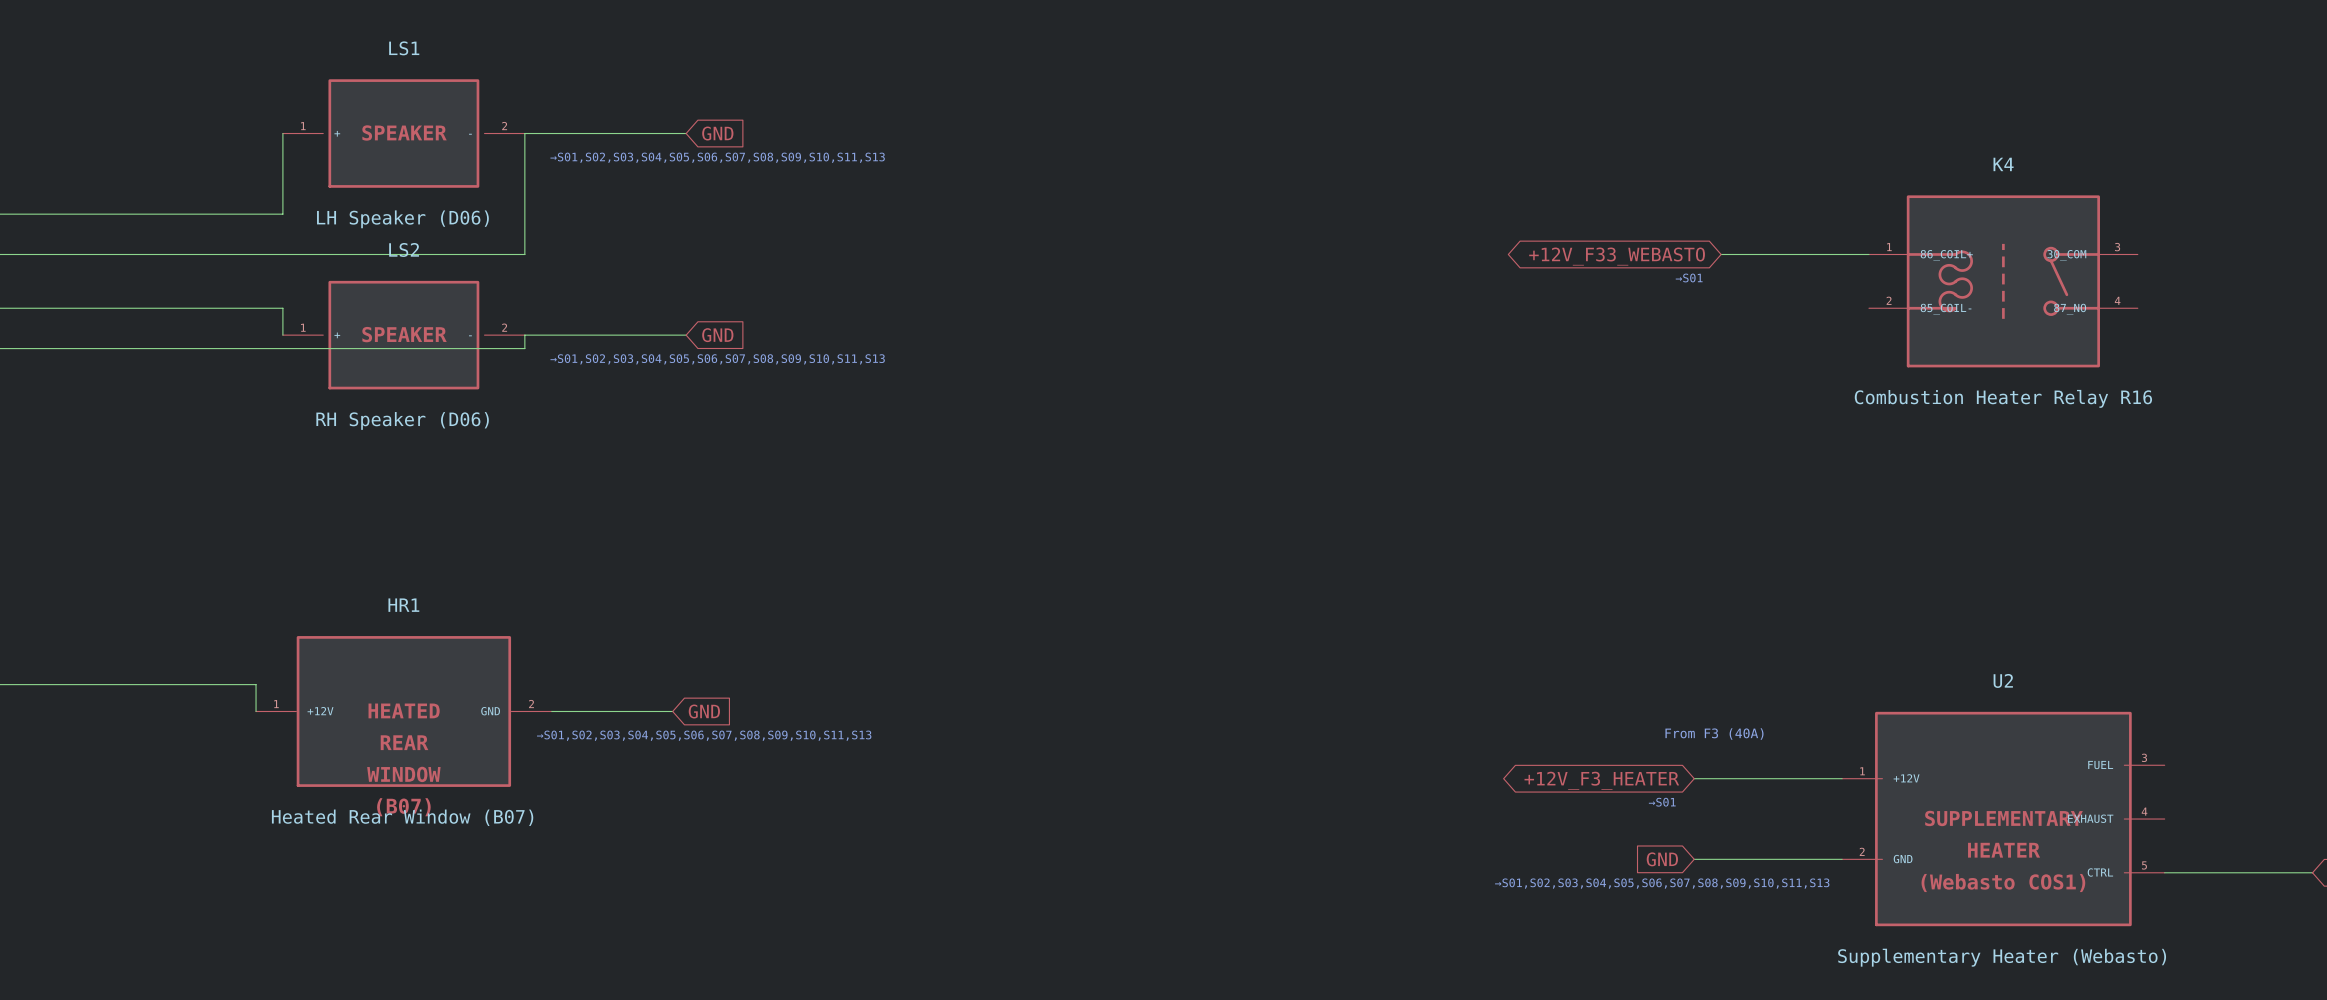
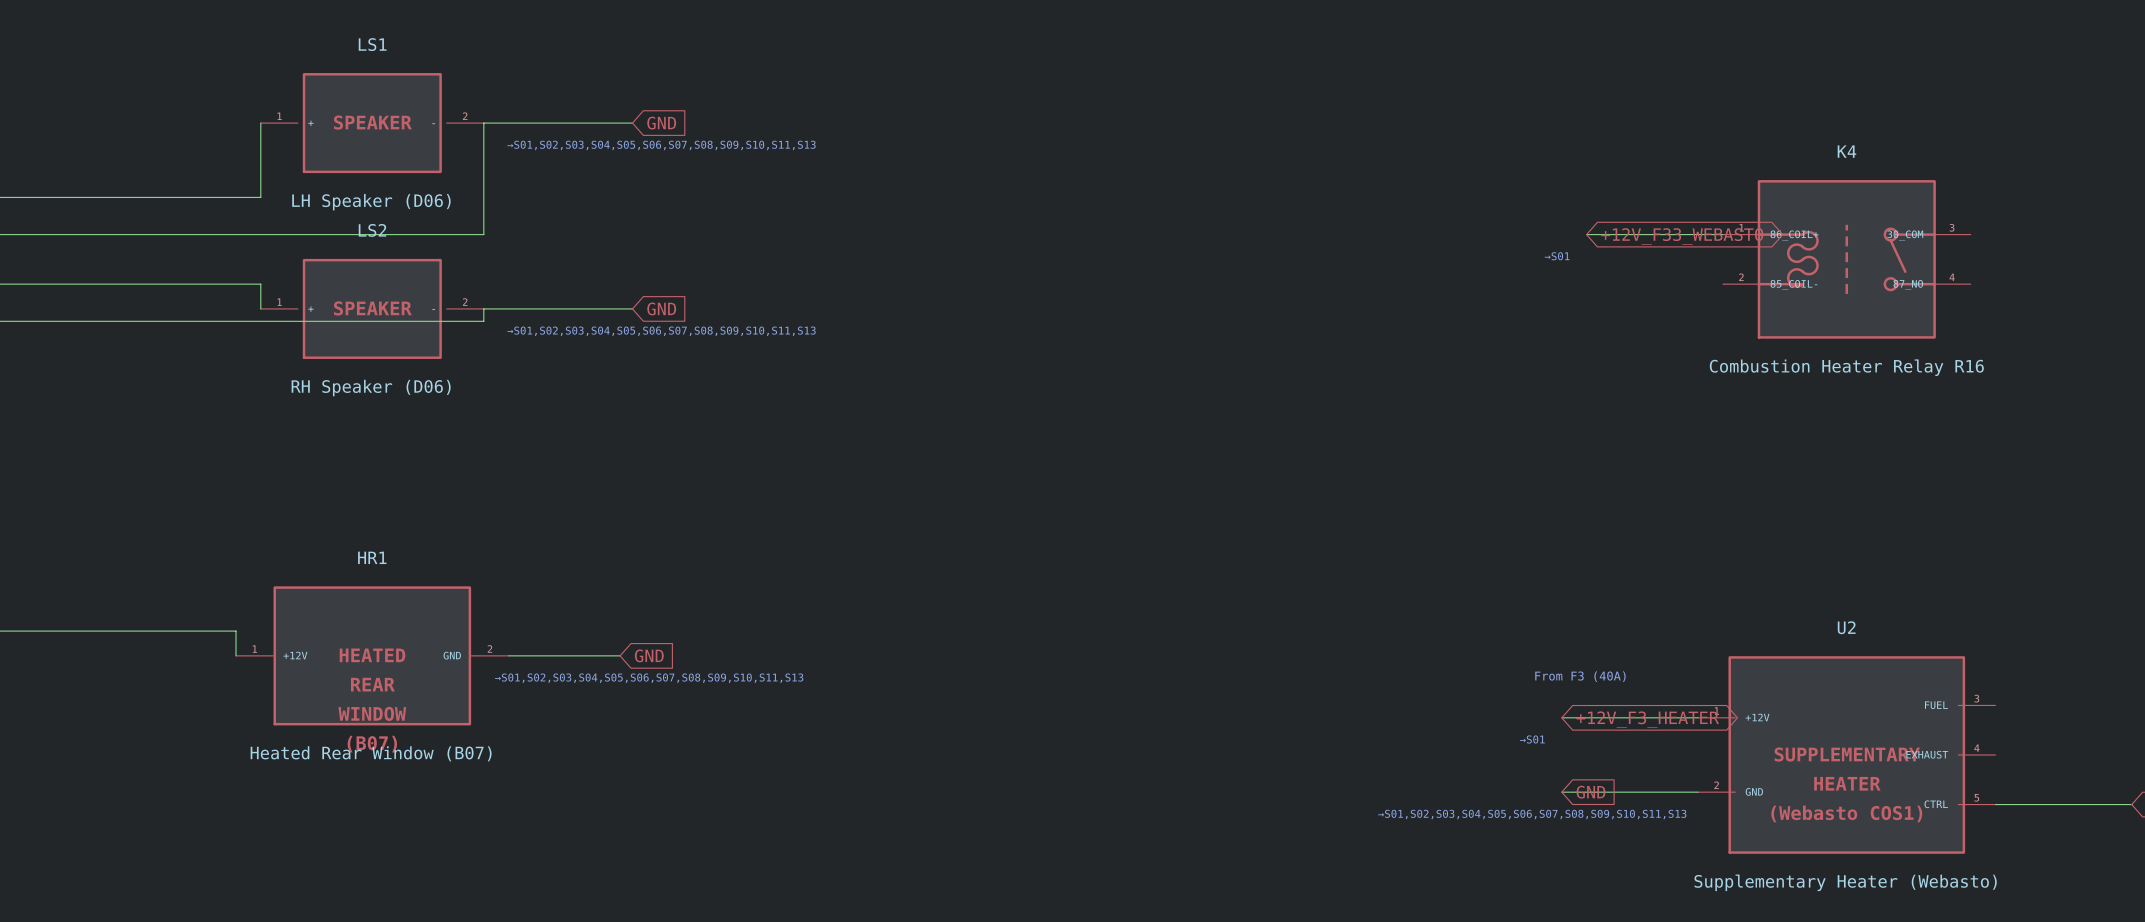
global label rotation: 0° (1617, 256) -> 180° (1682, 236)
global label position: +12V_F33_WEBASTO (1617, 256) -> +12V_F33_WEBASTO (1682, 236)
global label rotation: 0° (1601, 780) -> 180° (1647, 719)
global label rotation: 0° (1662, 859) -> 180° (1590, 792)

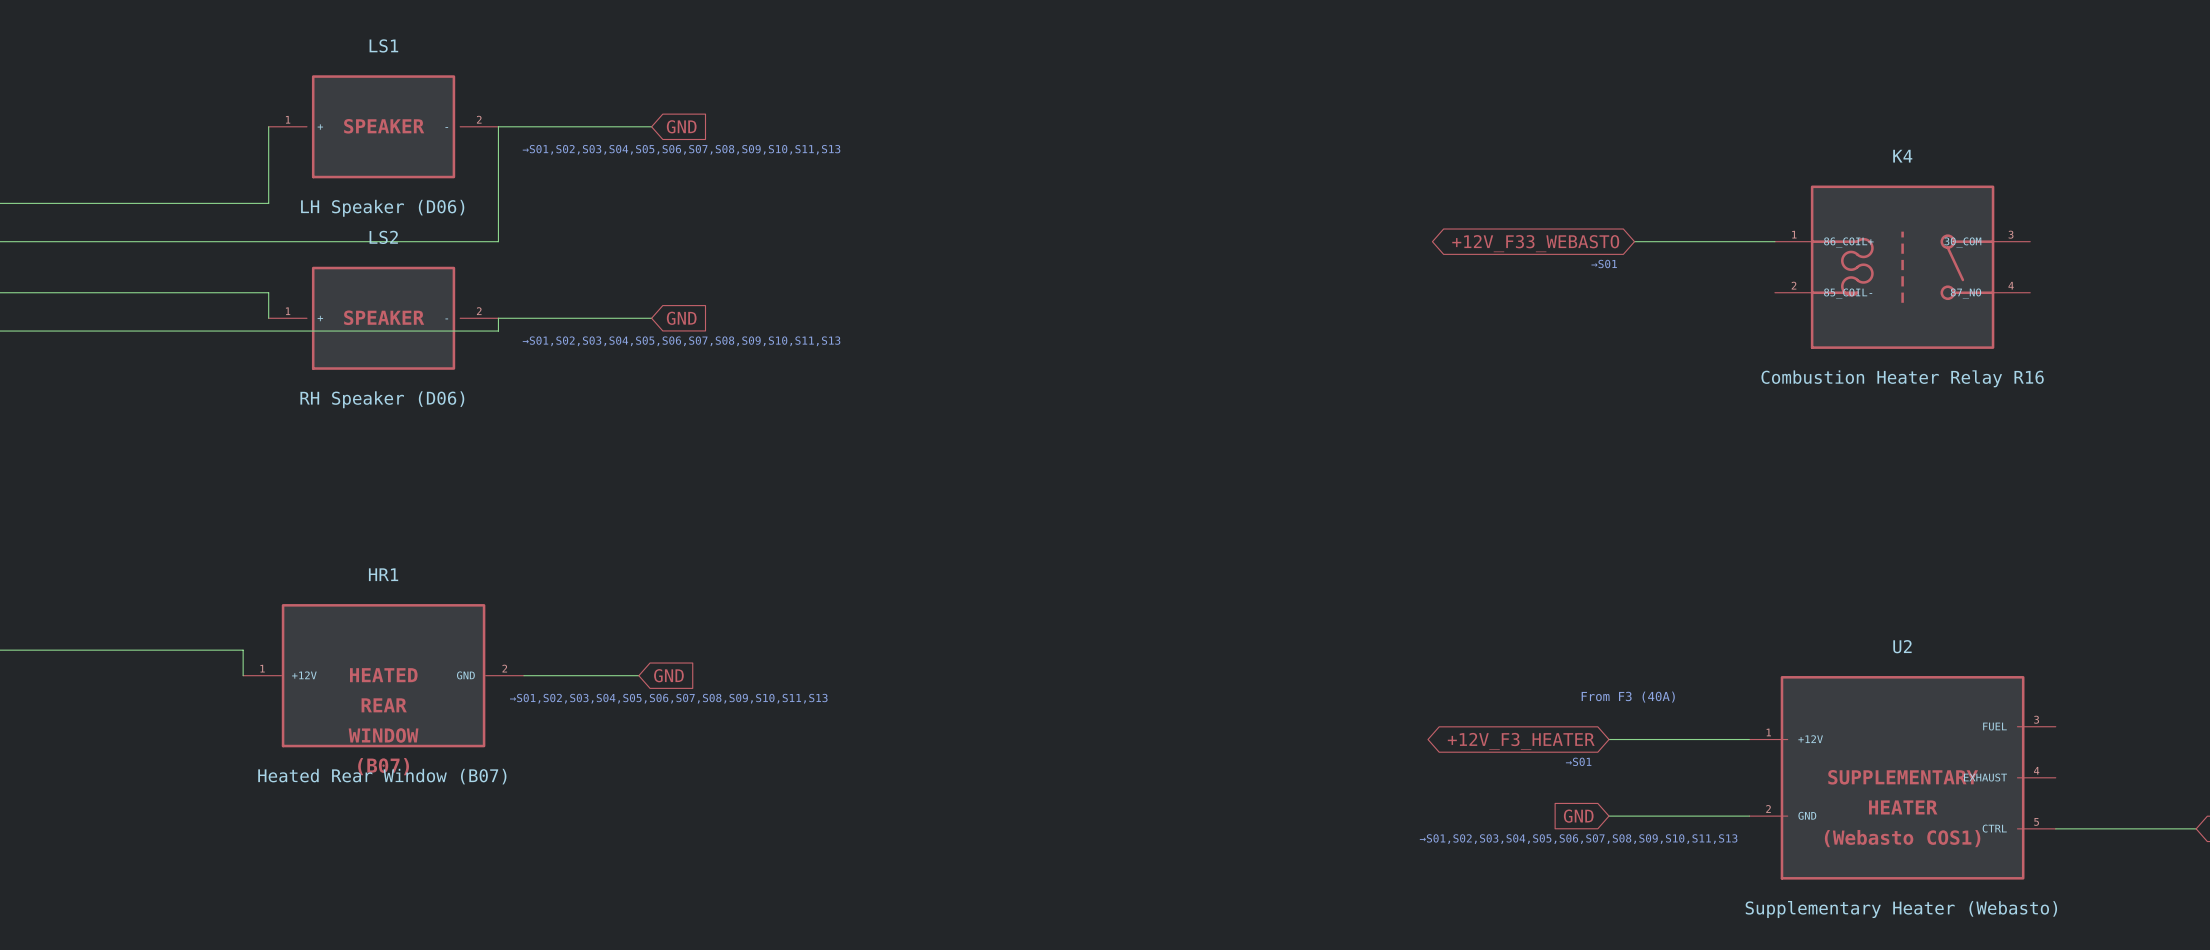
global label rotation: 0° (1682, 236) -> 180° (1535, 243)
global label position: +12V_F33_WEBASTO (1682, 236) -> +12V_F33_WEBASTO (1535, 243)
global label rotation: 0° (1647, 719) -> 180° (1521, 741)
global label rotation: 0° (1590, 792) -> 180° (1578, 816)

